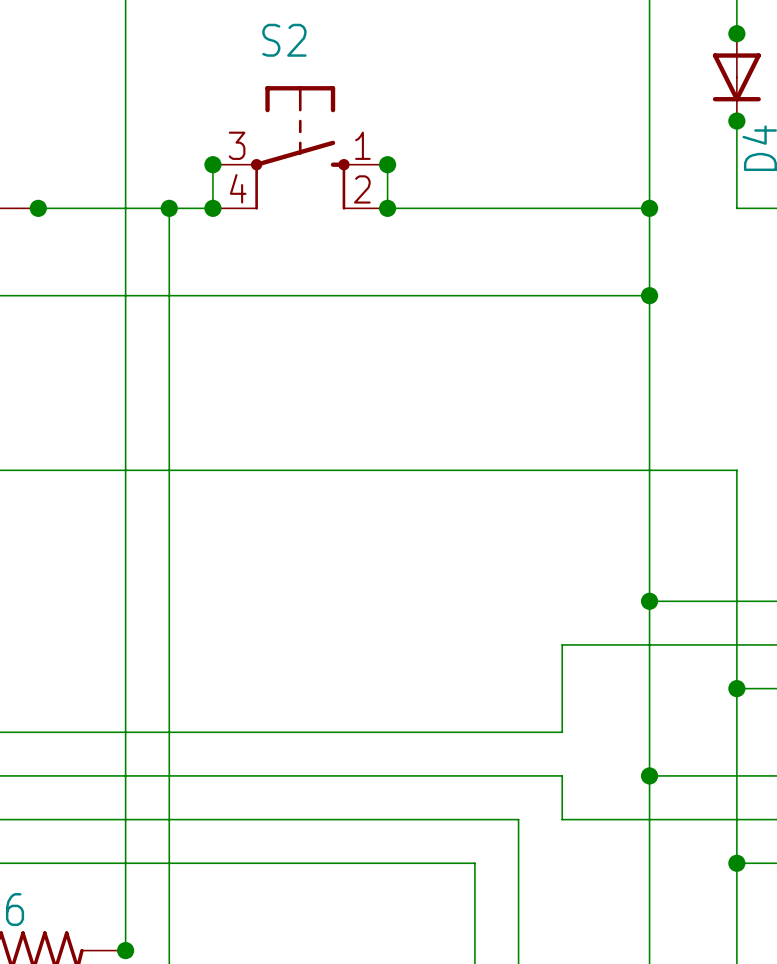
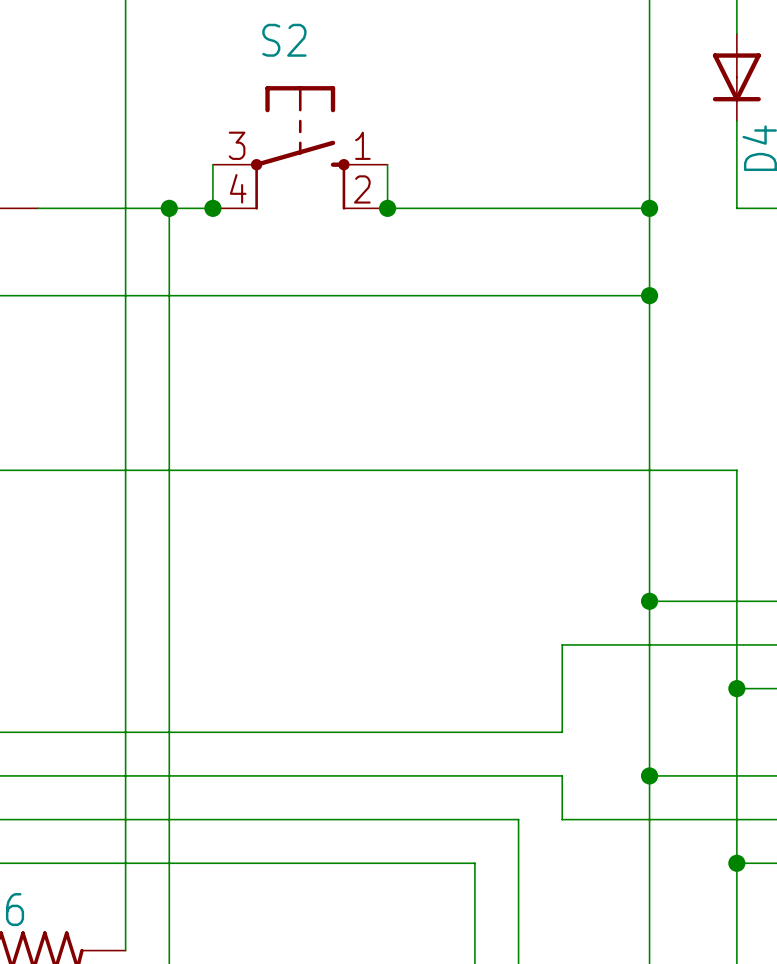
junction: (736, 33) -> none
junction: (736, 121) -> none
junction: (212, 164) -> none
junction: (387, 164) -> none
junction: (38, 208) -> none
junction: (125, 950) -> none

